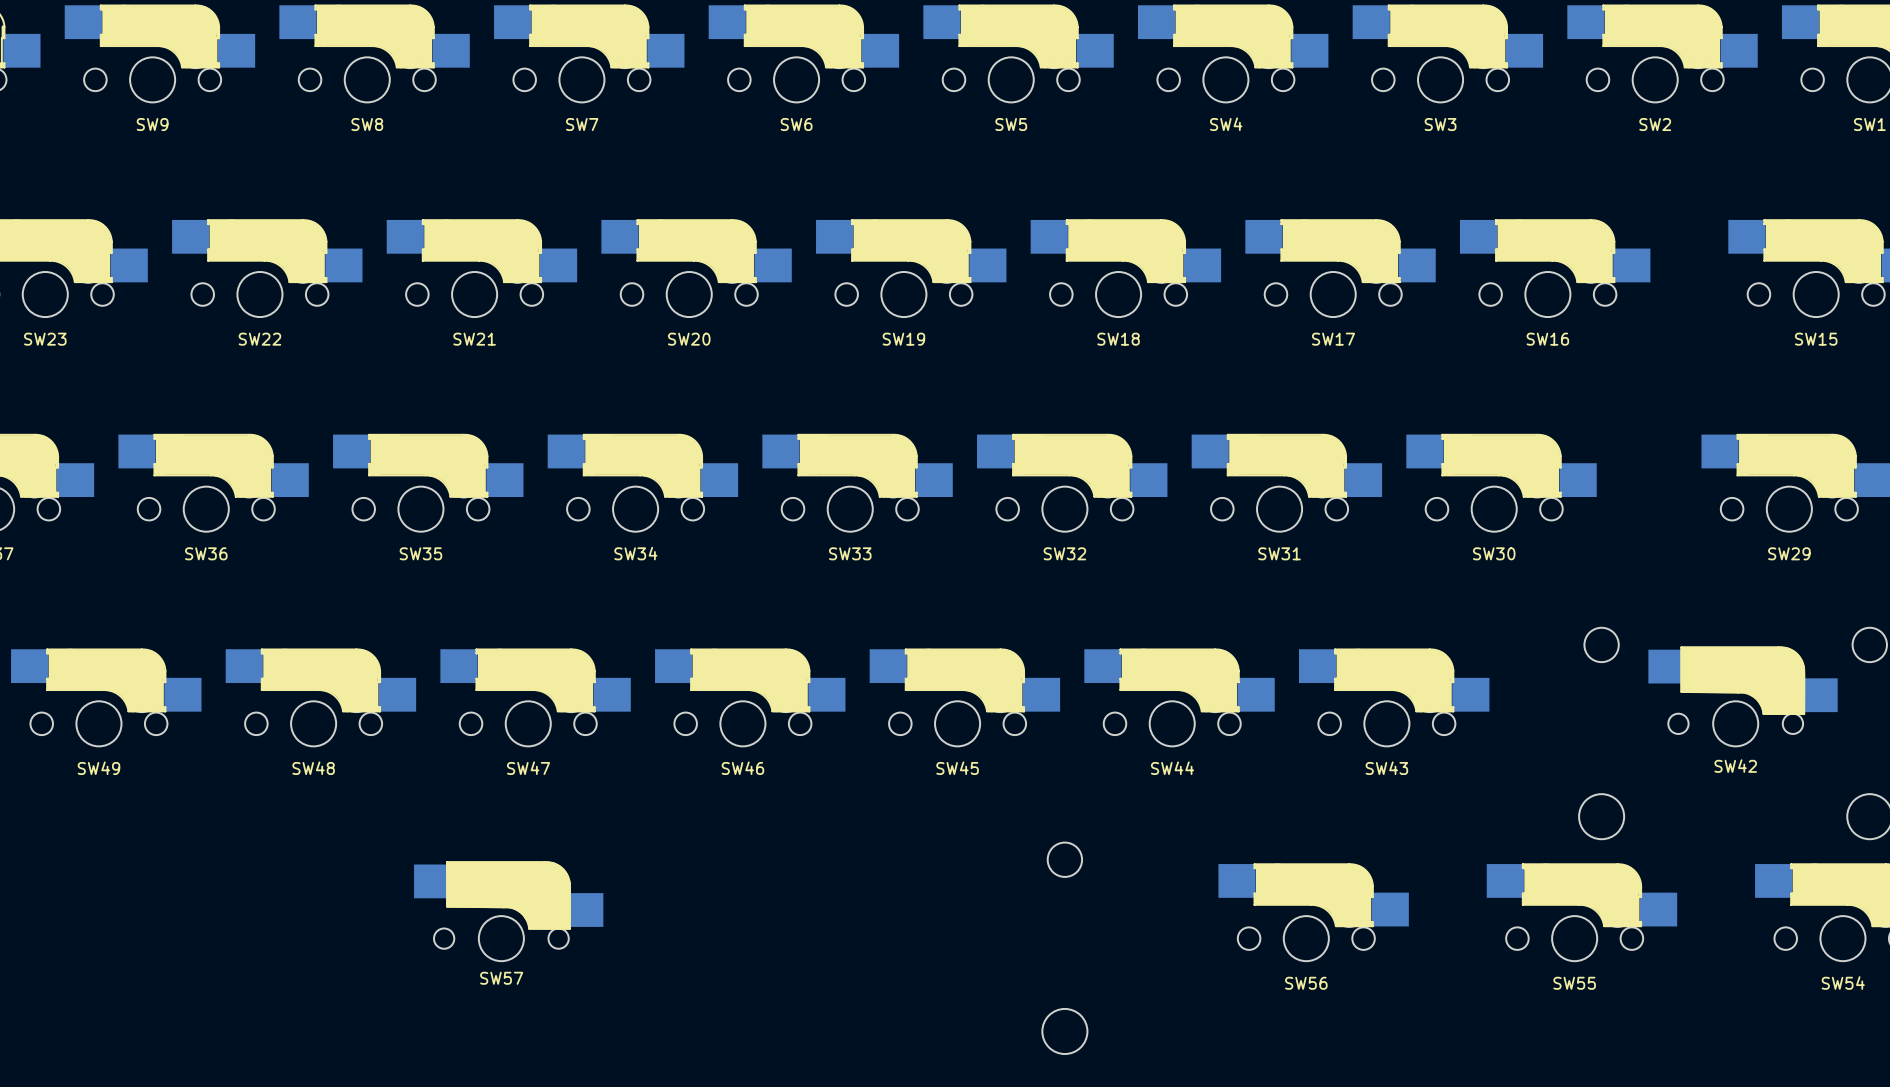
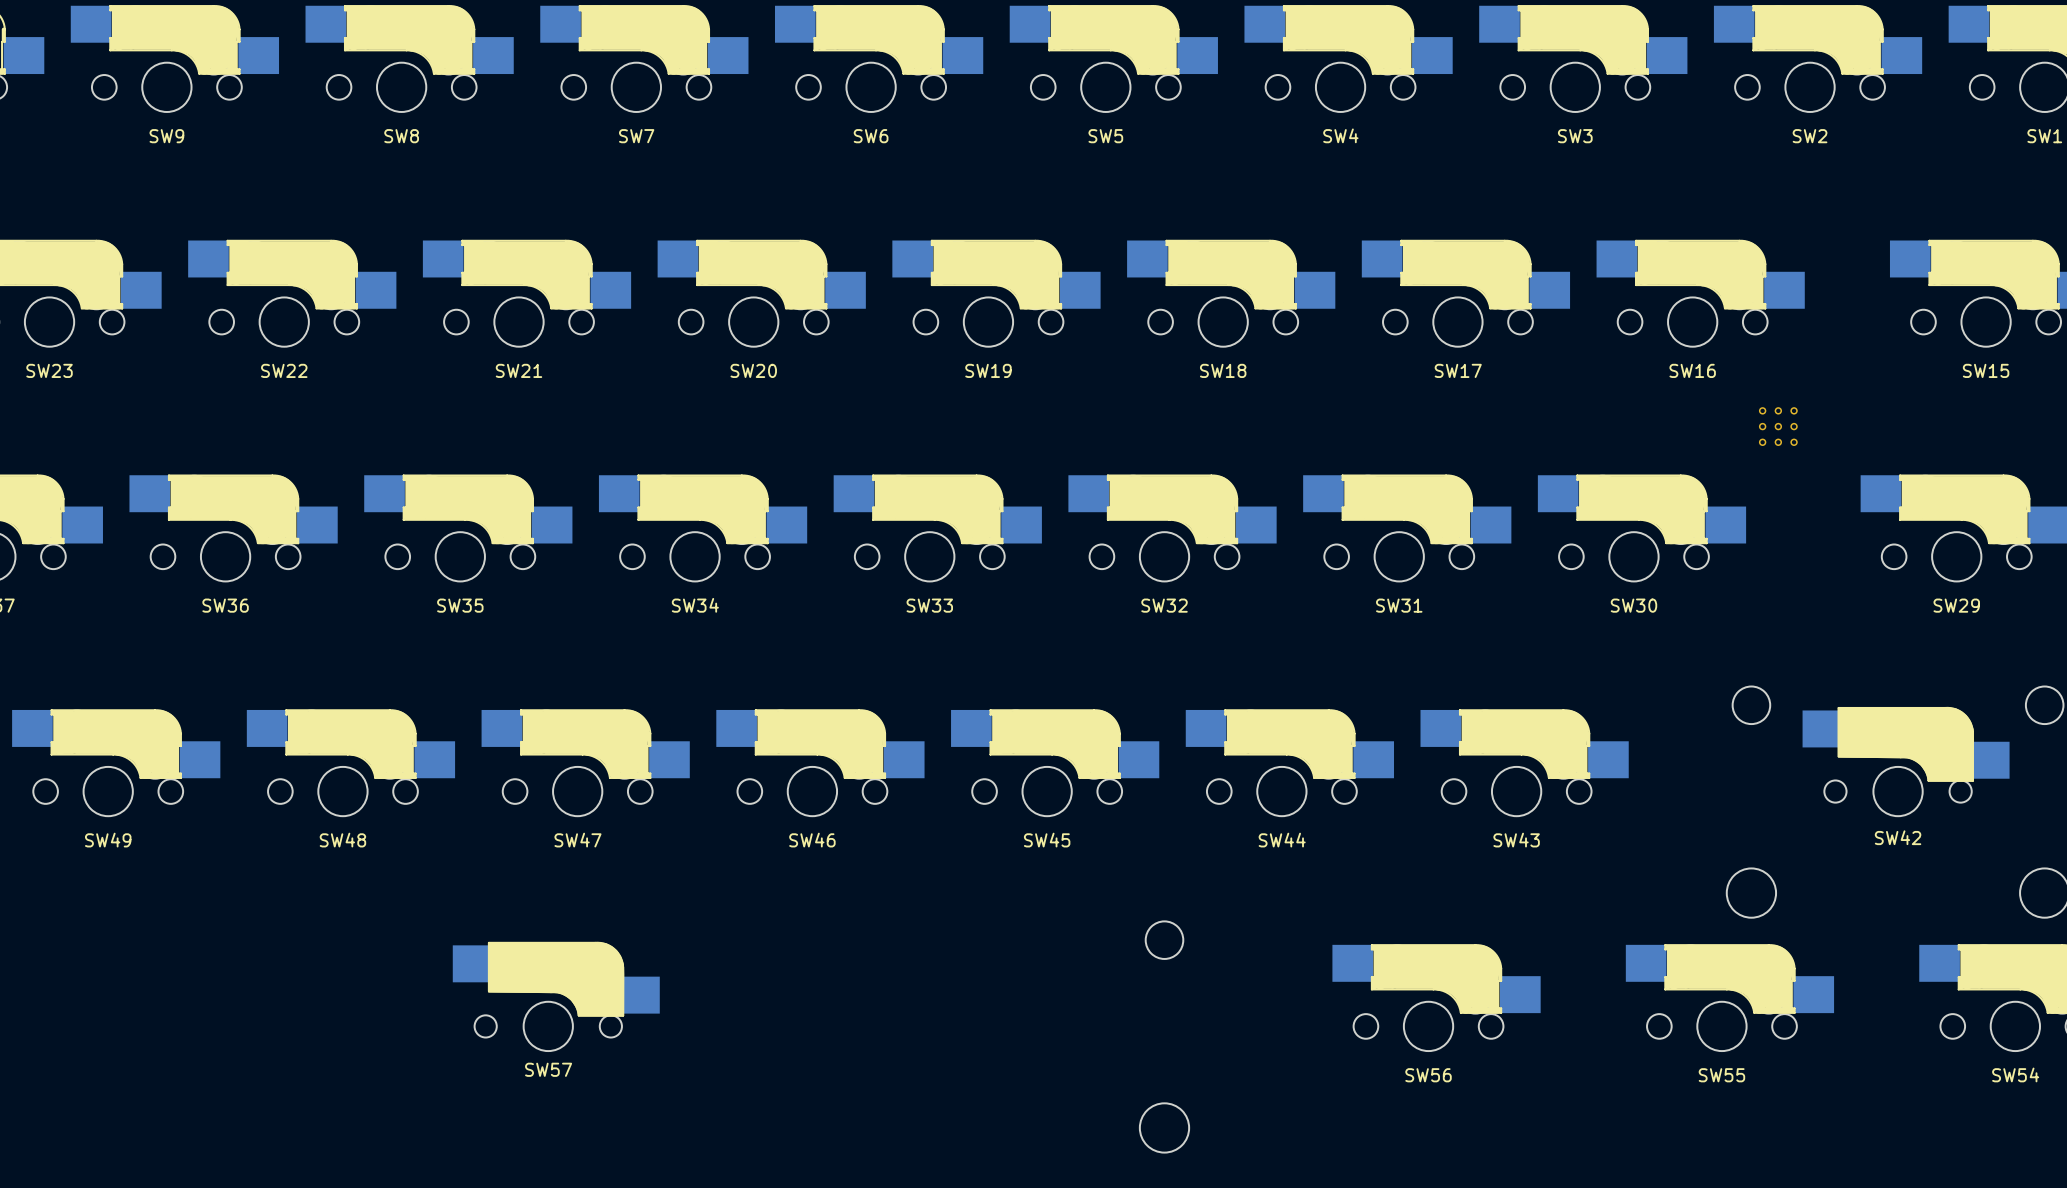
part: none -> (1778, 426)

